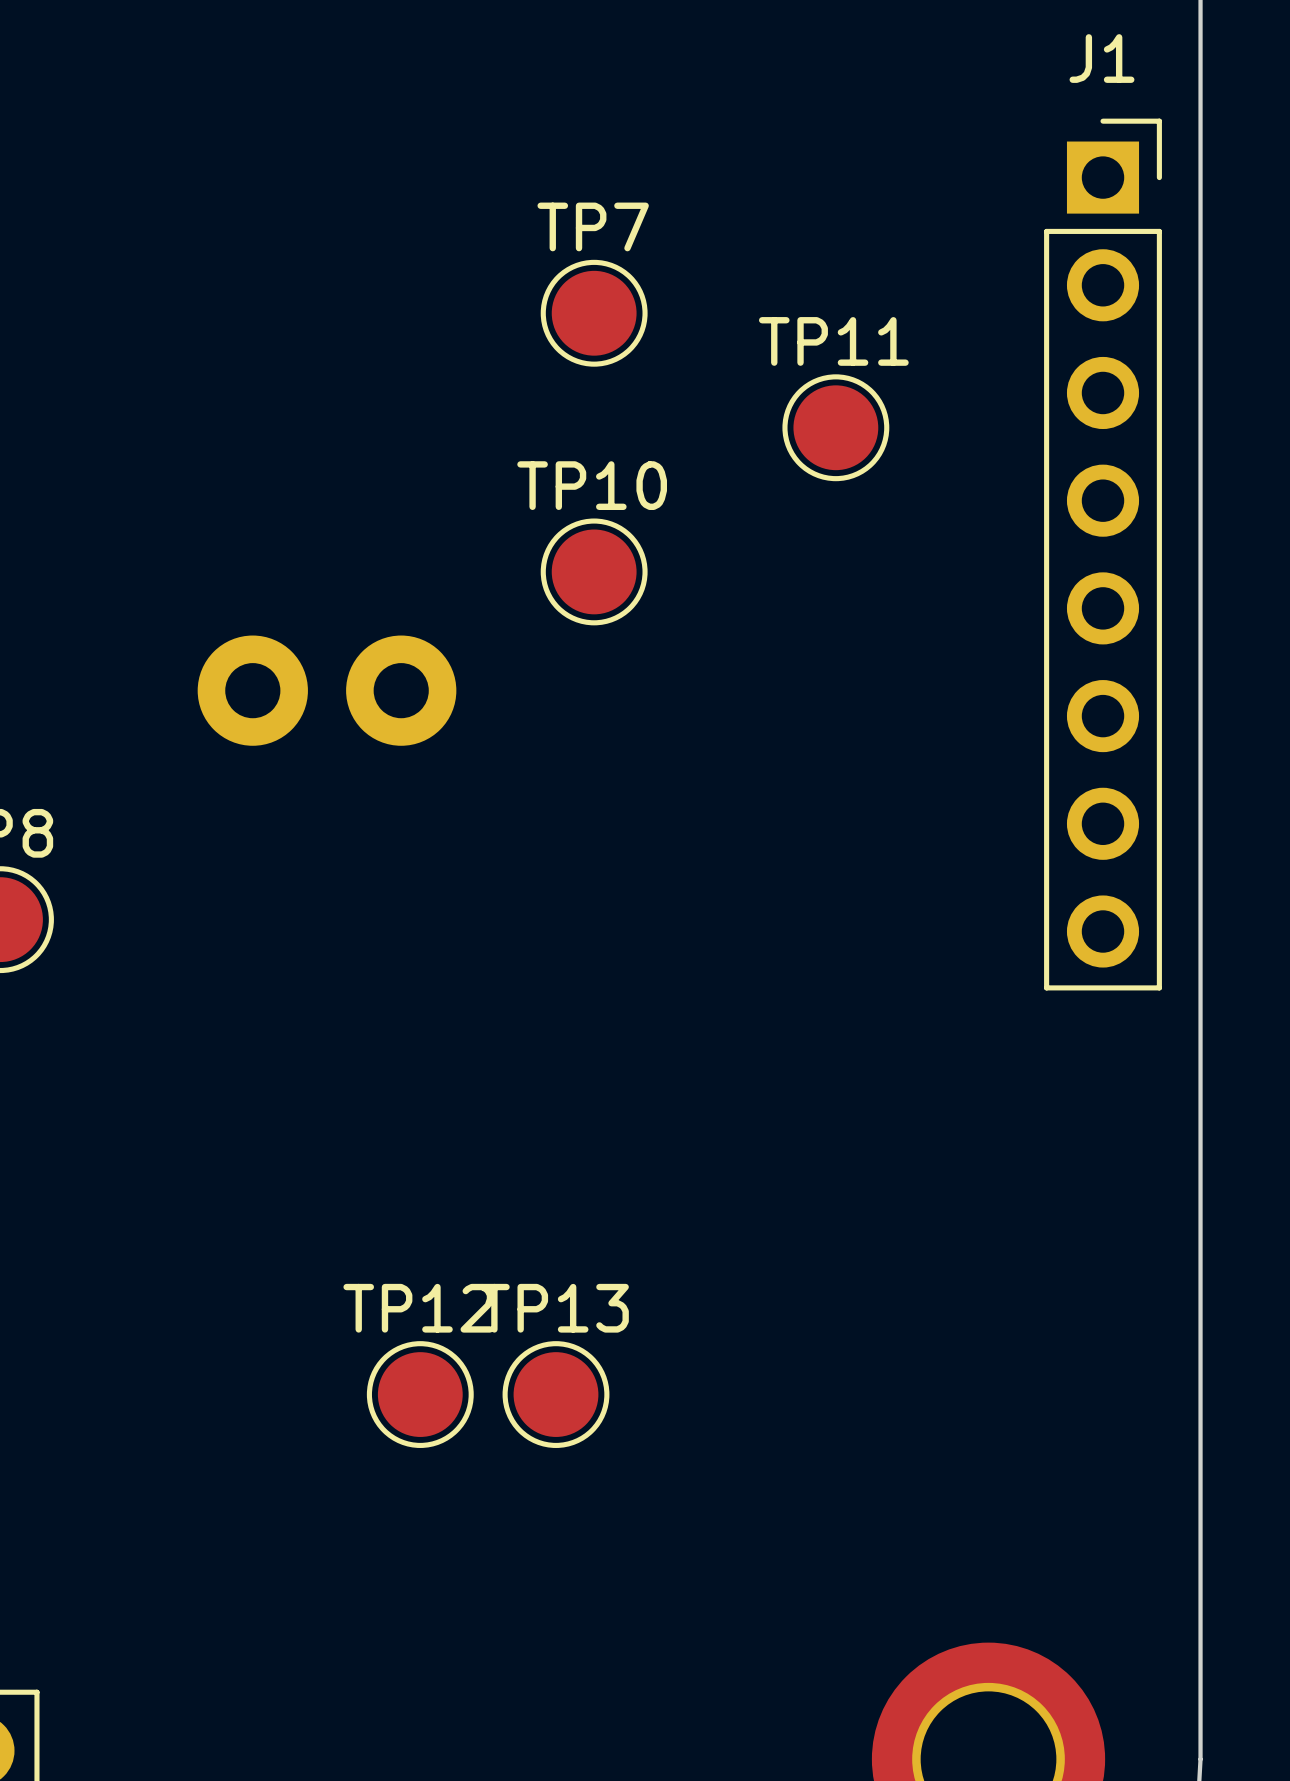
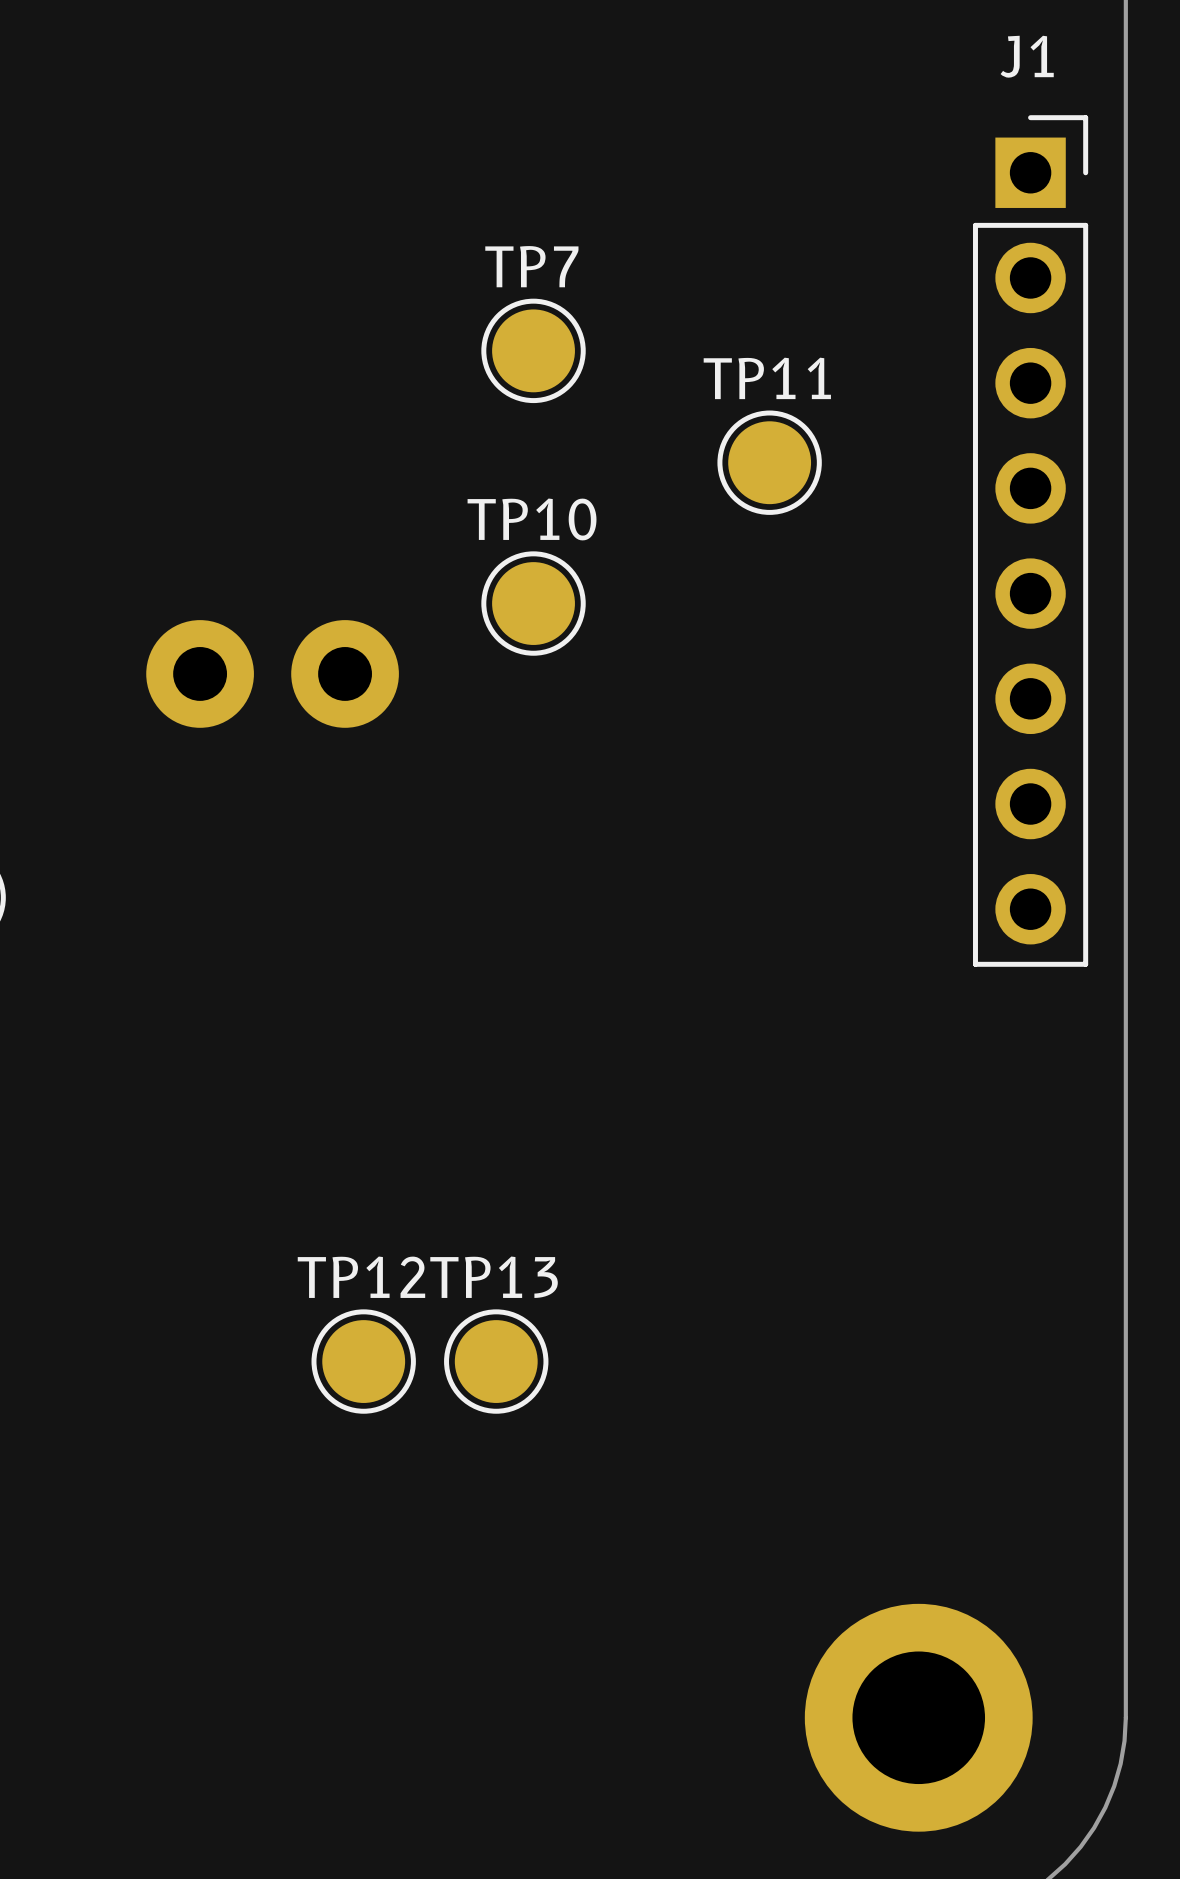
TP7 position: (594, 313) -> (533, 350)
TP11 position: (835, 427) -> (769, 462)
TP10 position: (594, 571) -> (533, 603)

